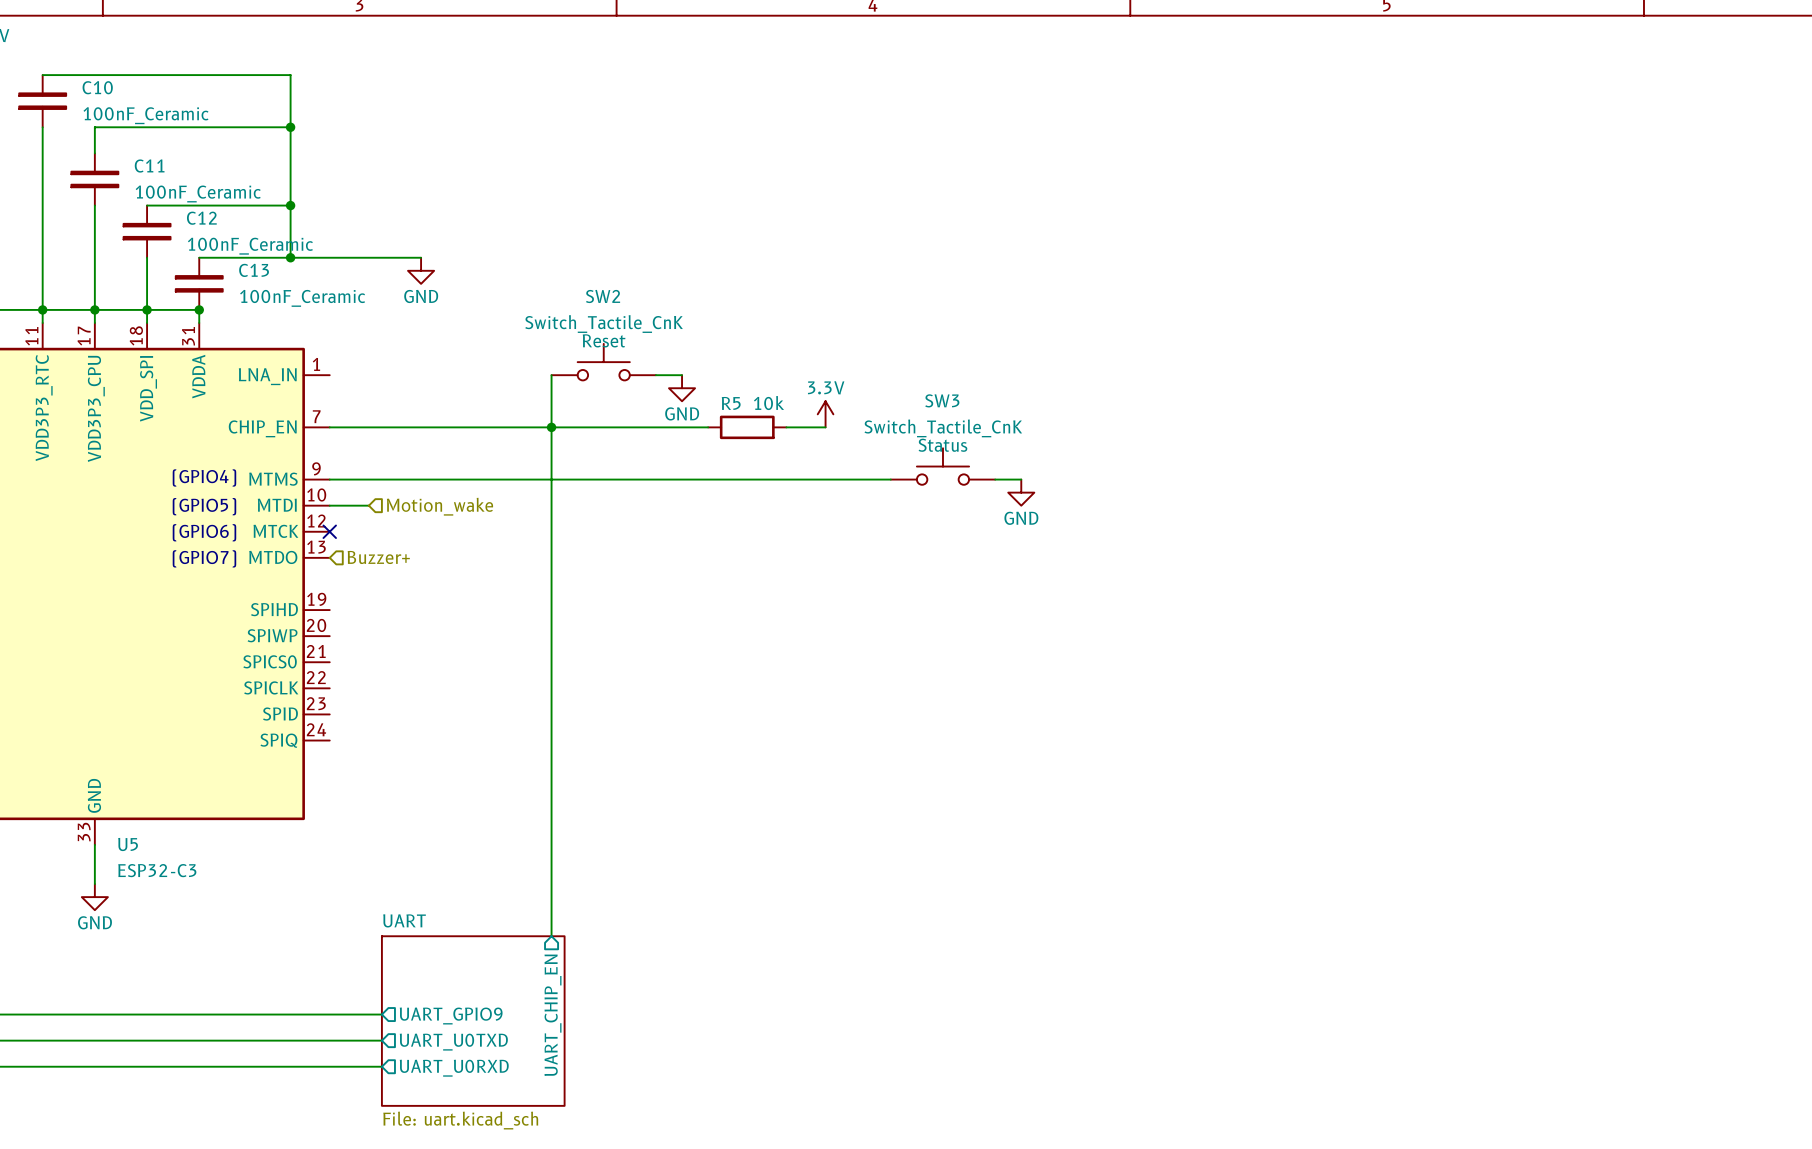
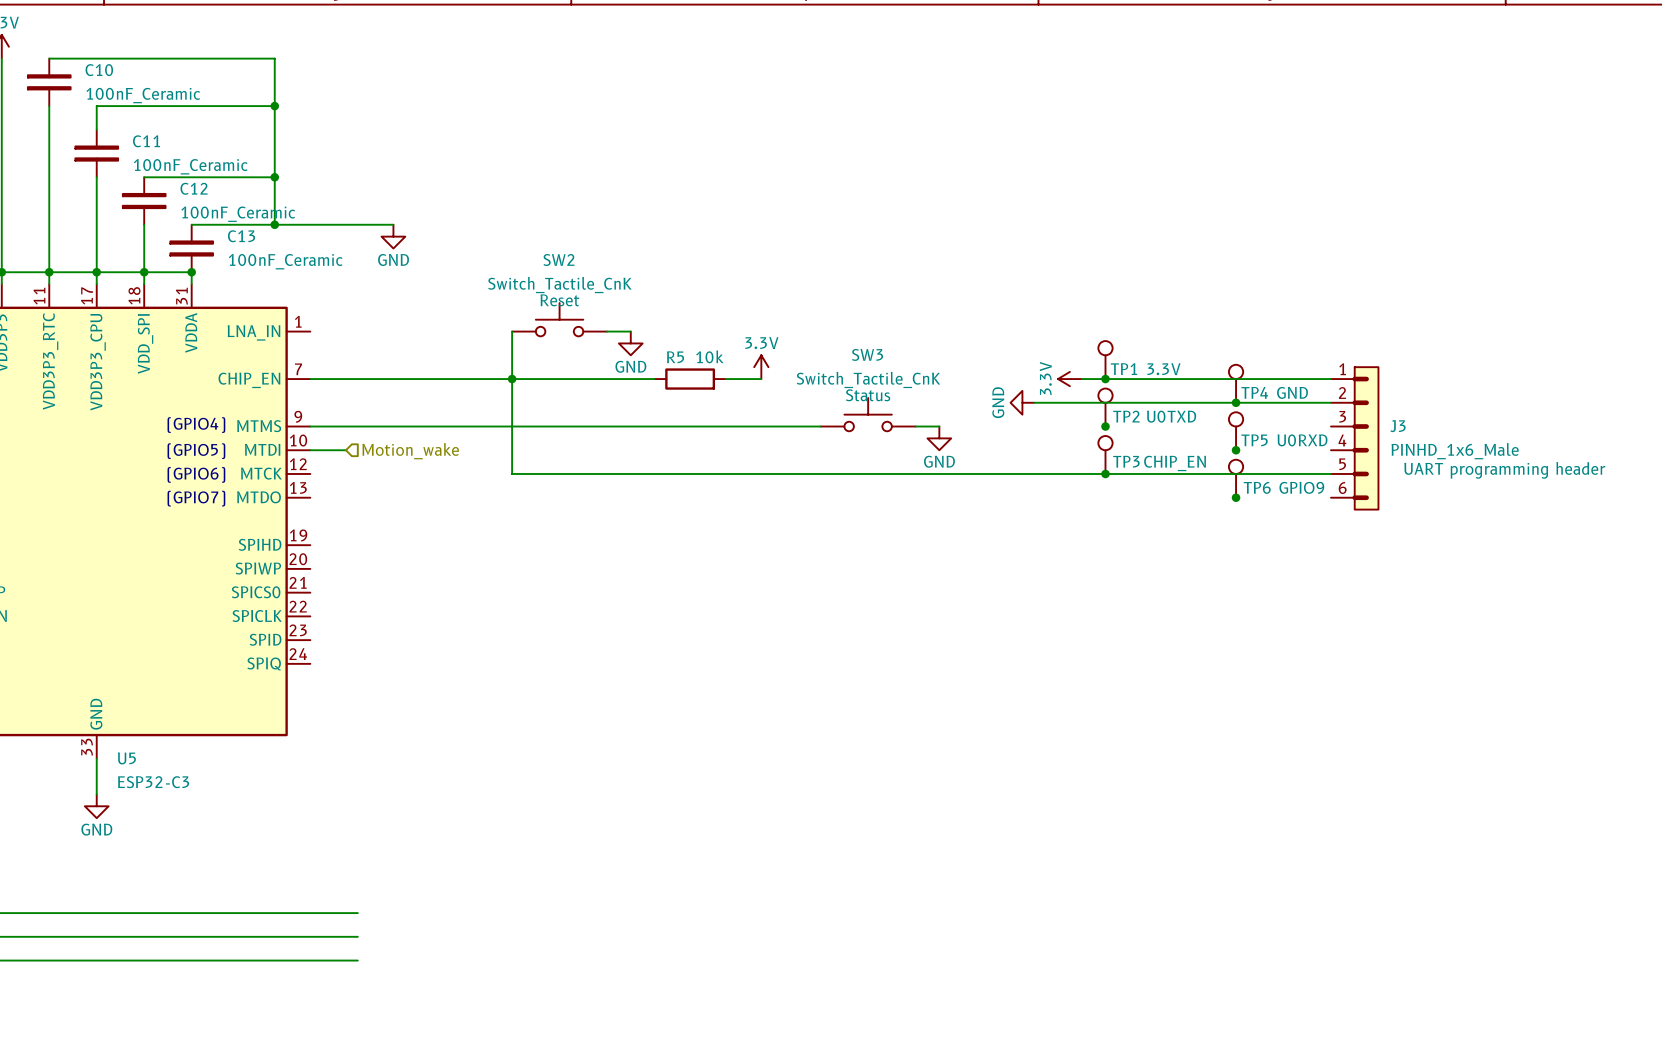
TP1: none -> 3.3V (1105, 360)
power symbol: none -> 3.3V (1069, 379)
wire: none -> (1081, 379) (1330, 379)
junction: none -> (1105, 379)
TP4: none -> GND (1236, 383)
power symbol: none -> GND (1022, 402)
wire: none -> (1034, 402) (1330, 402)
junction: none -> (1236, 402)
TP2: none -> U0TXD (1105, 407)
junction: none -> (1105, 426)
TP5: none -> U0RXD (1236, 431)
J3: none -> PINHD_1x6_Male (1354, 438)
junction: none -> (1236, 450)
TP3: none -> CHIP_EN (1105, 454)
no-connect mark: (329, 531) -> none
wire: (551, 531) (551, 936) -> (512, 473) (1330, 473)
junction: none -> (1105, 473)
TP6: none -> GPIO9 (1236, 478)
hierarchical label: Buzzer+ (378, 557) -> none
junction: none -> (1236, 497)
sheet pin: UART_CHIP_EN (553, 1015) -> none
sheet pin: UART_GPIO9 (451, 1016) -> none
sheet UART: File: uart.kicad_sch (473, 1021) -> none
sheet pin: UART_U0TXD (453, 1042) -> none
sheet pin: UART_U0RXD (454, 1068) -> none

